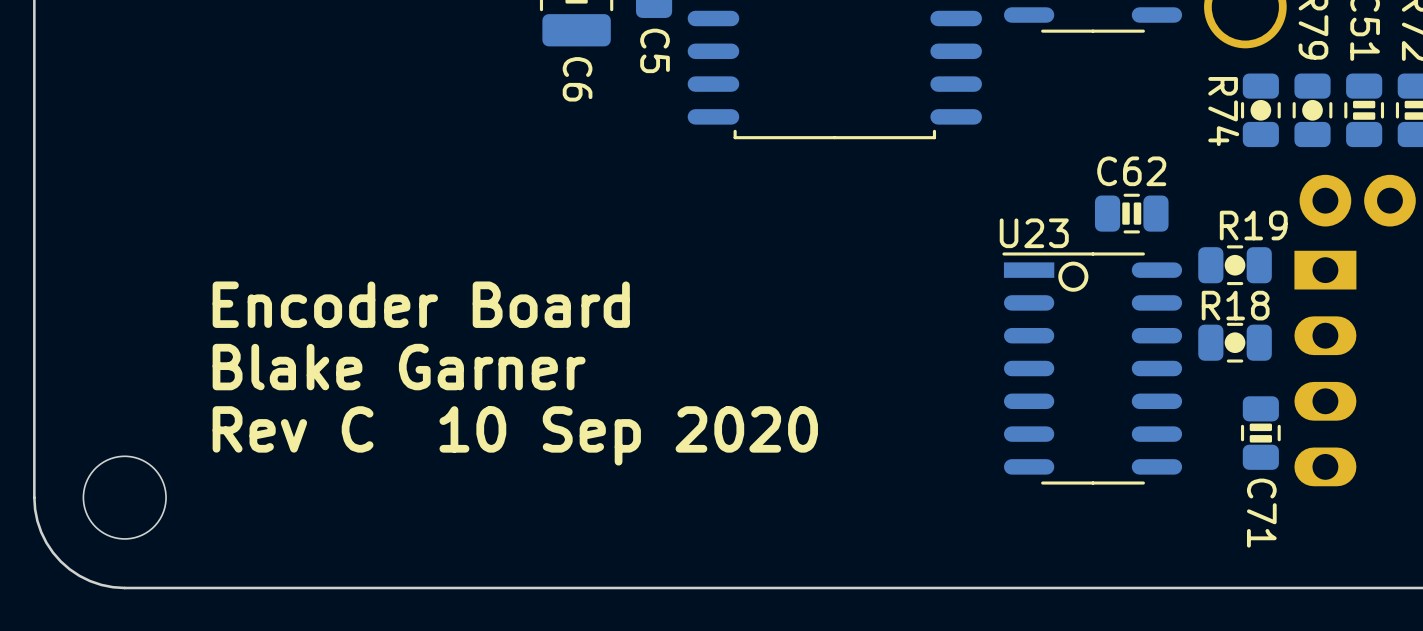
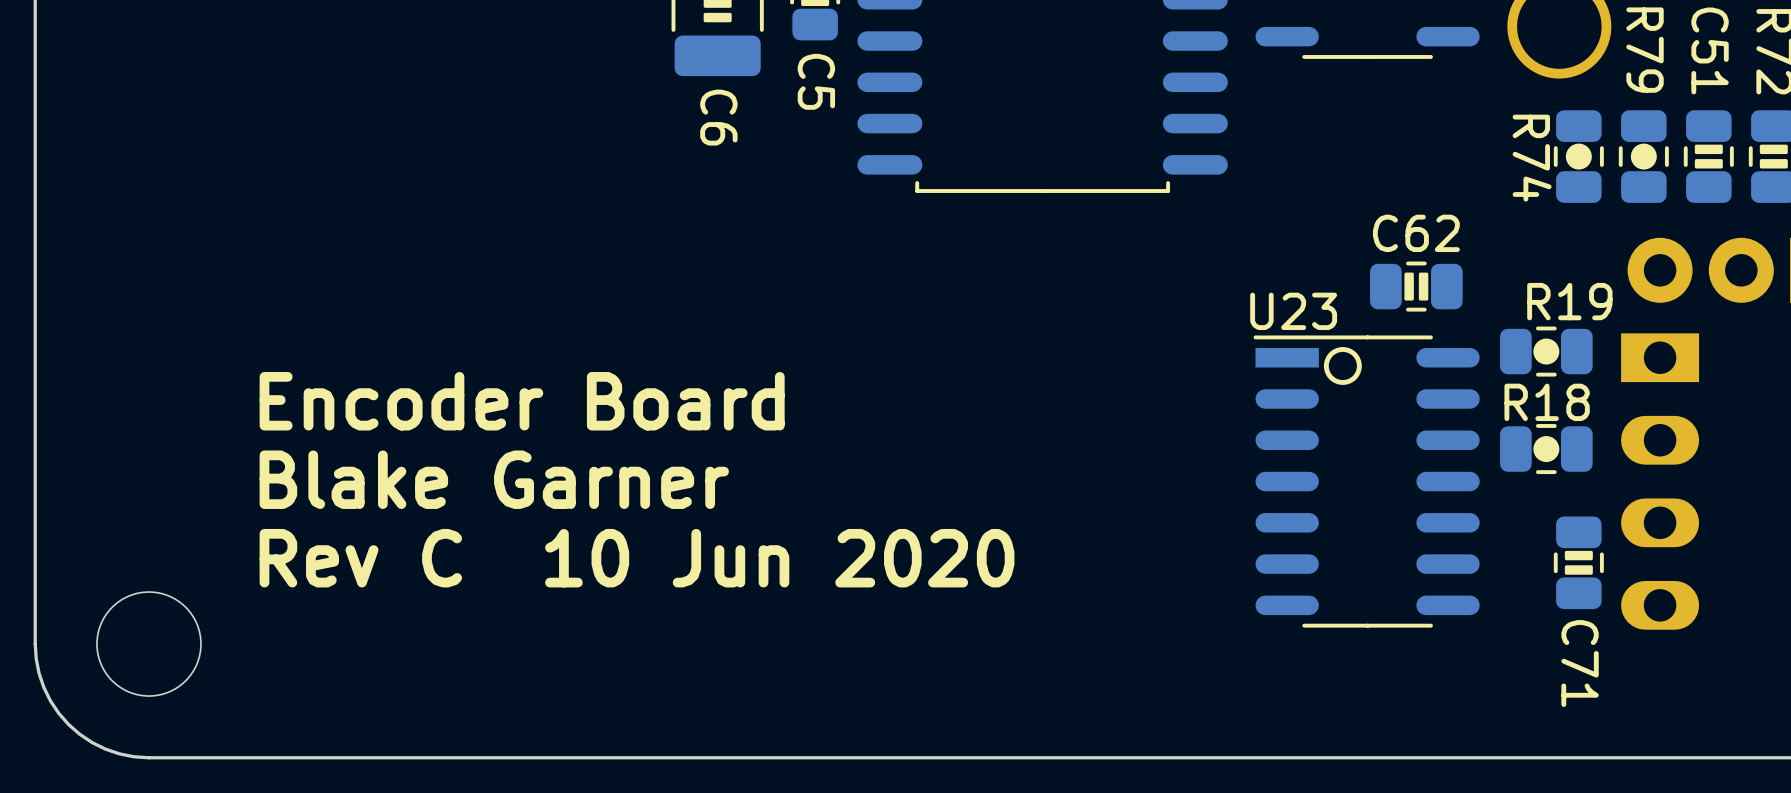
text: Rev C 10 Sep 2020 (515, 435) -> Rev C 10 Jun 2020 (637, 558)

